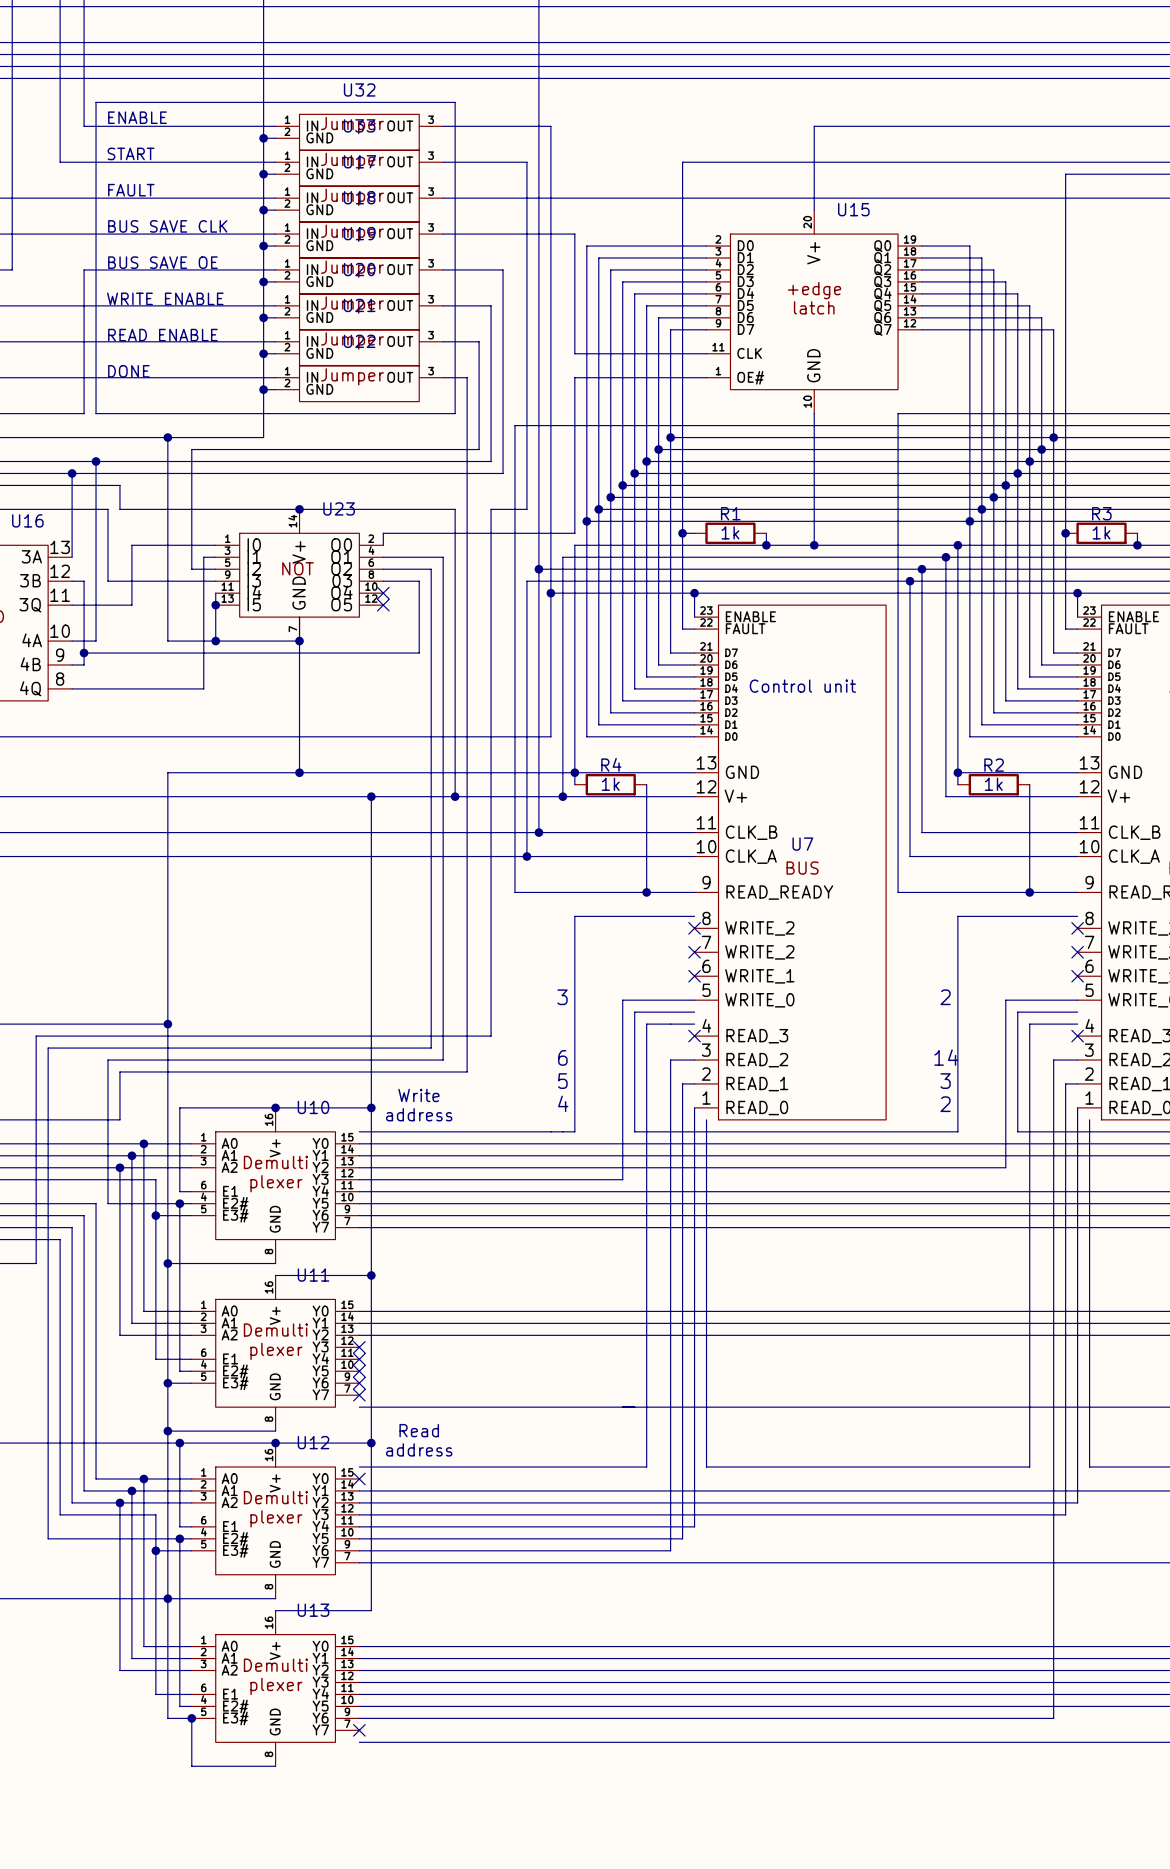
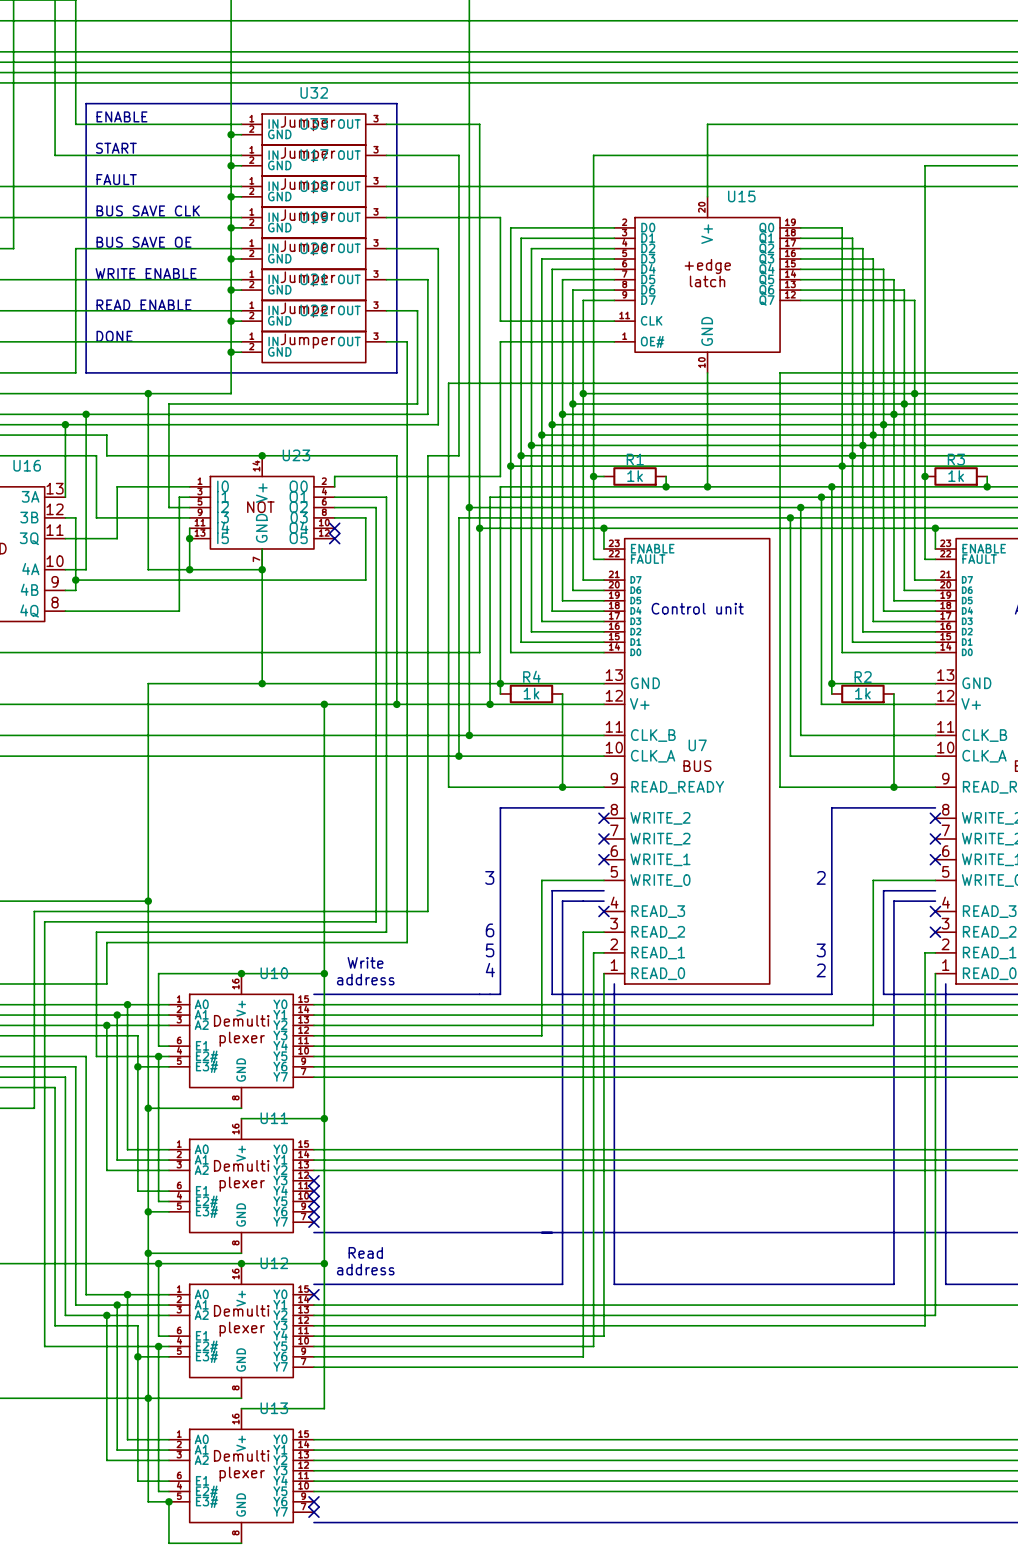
text: 14 (946, 1057) -> none
wire: (1077, 1060) (1053, 1060) (1053, 1718) (359, 1718) -> none
no-connect mark: none -> (935, 932)
no-connect mark: none -> (313, 1501)

